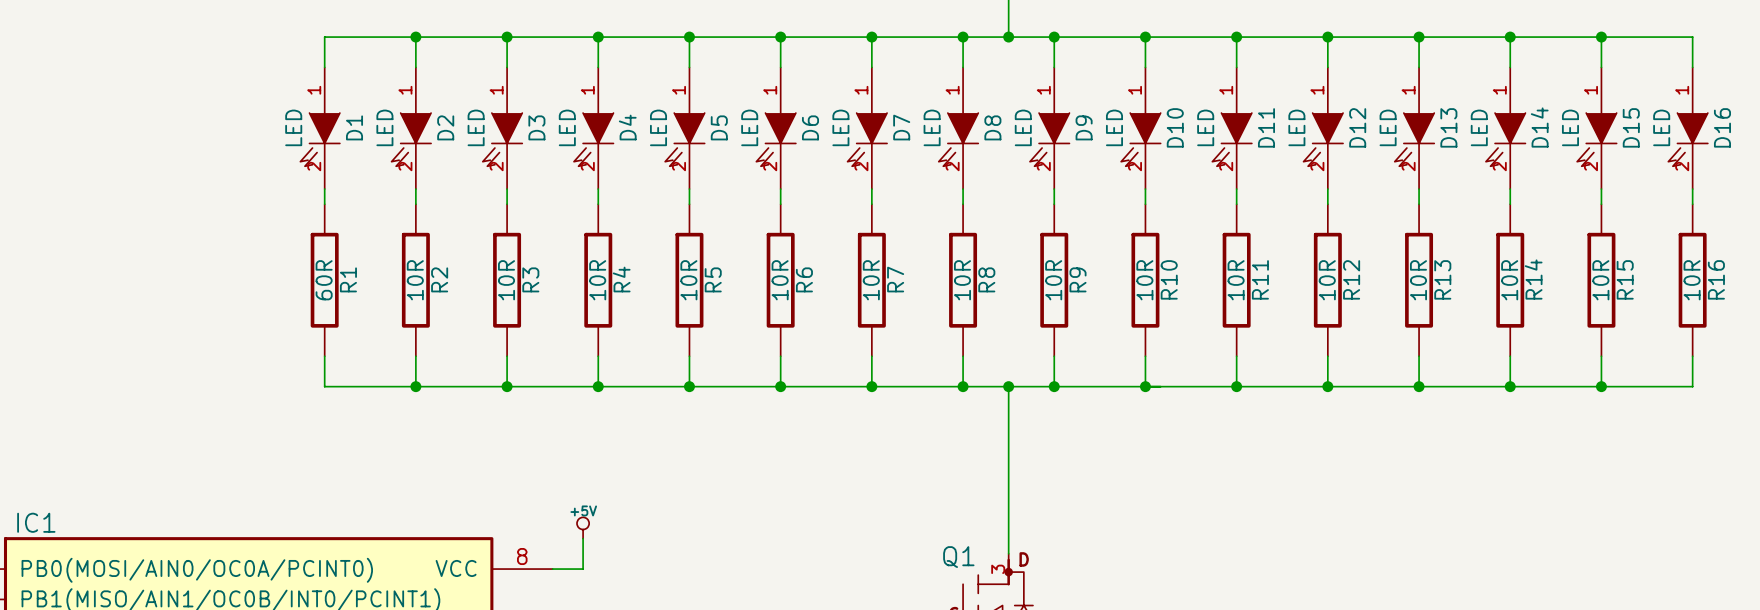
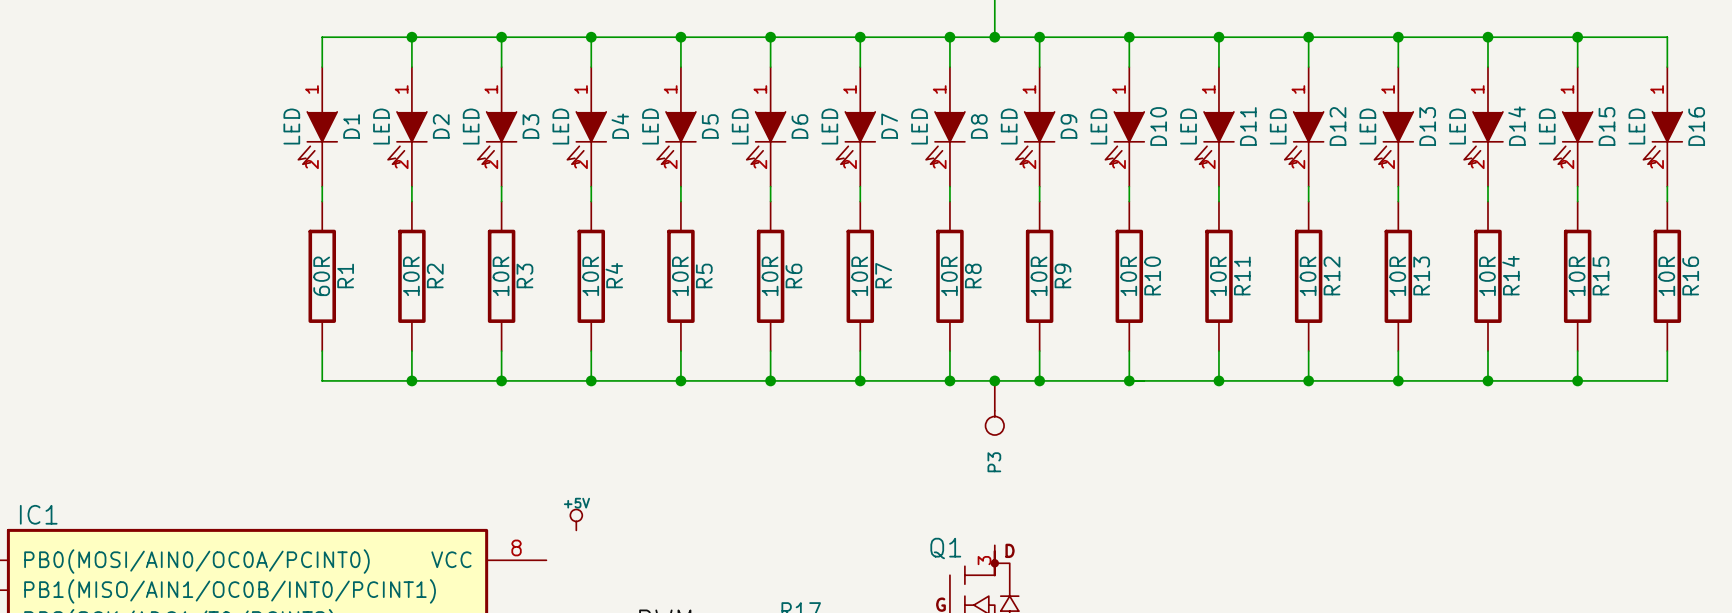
wire: (1008, 386) (1008, 553) -> none
P3: none -> (994, 407)
wire: (583, 538) (583, 569) (552, 569) -> none

